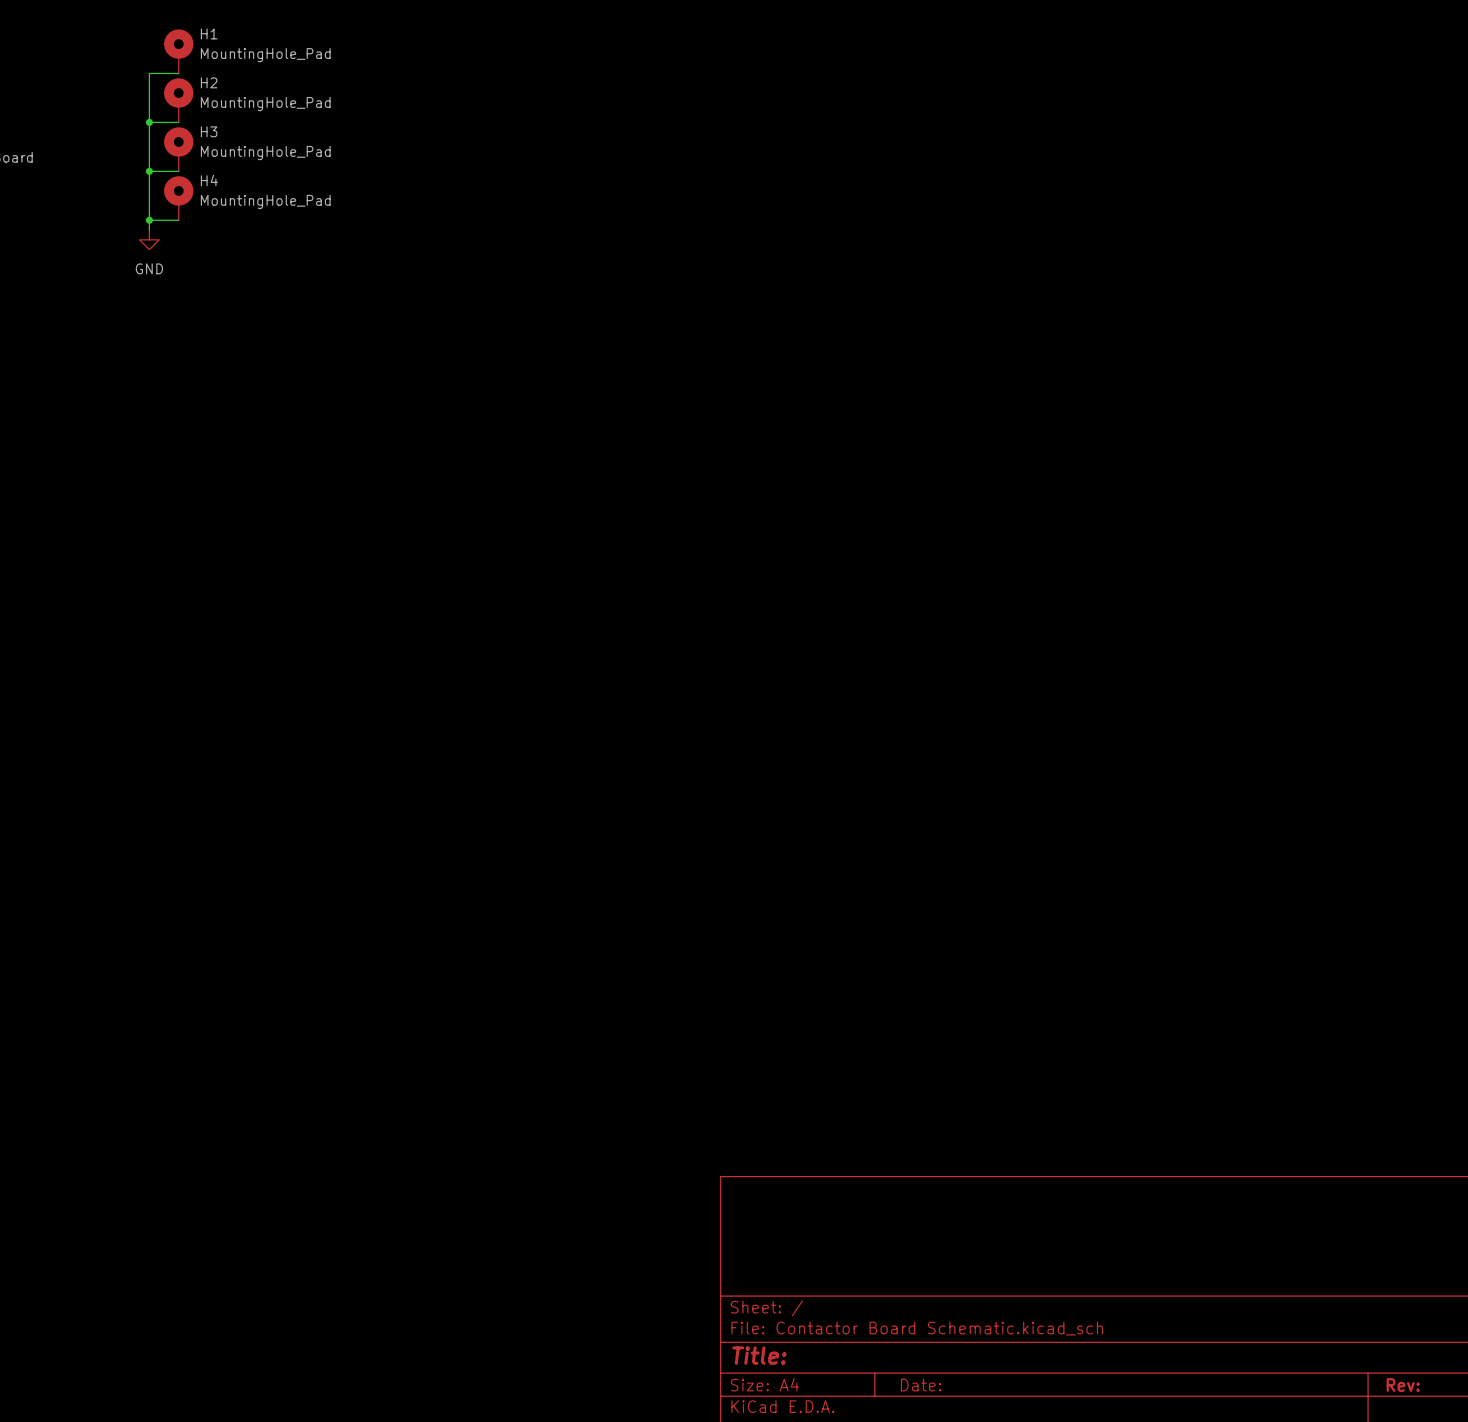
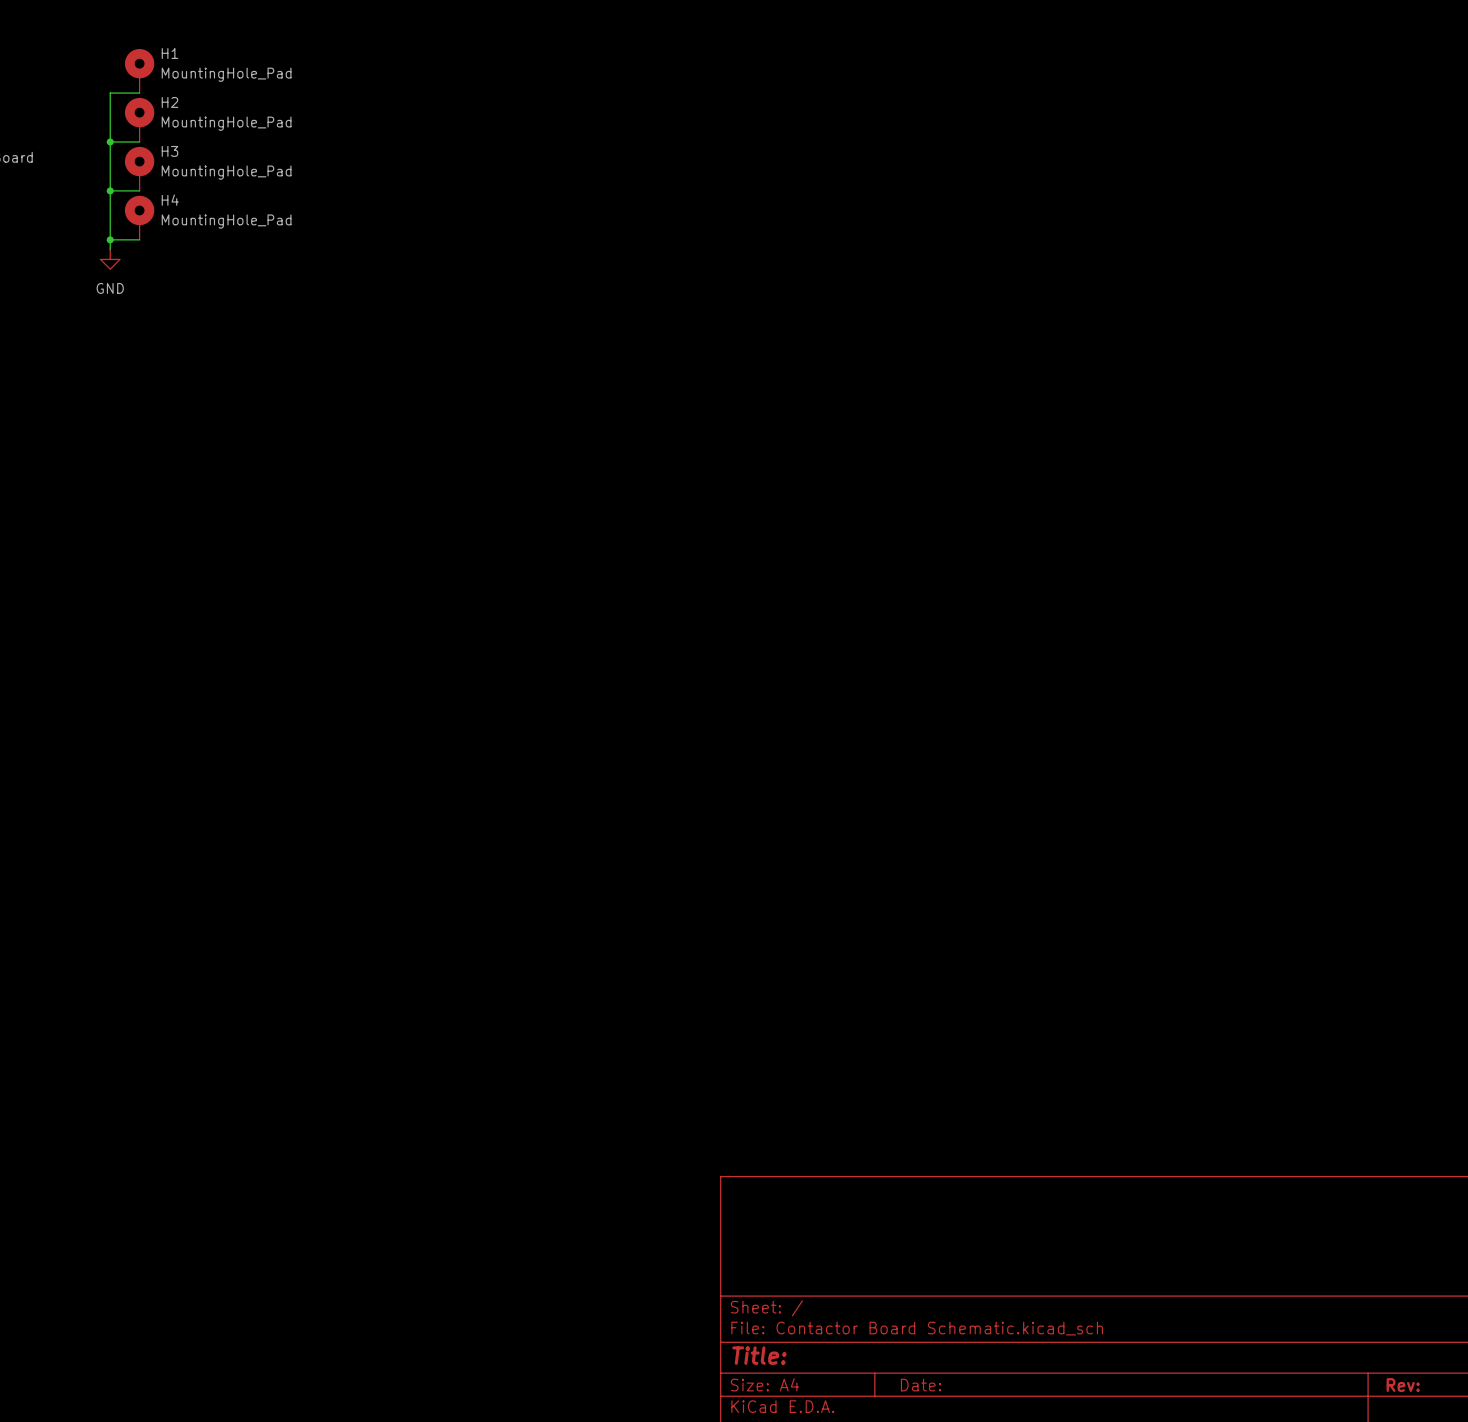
H1 position: (178, 51) -> (139, 71)
wire: (178, 73) (149, 73) (149, 230) -> (139, 93) (110, 93) (110, 249)
H2 position: (178, 100) -> (139, 119)
wire: (149, 122) (178, 122) -> (110, 141) (139, 141)
junction: (149, 122) -> none
junction: none -> (110, 141)
H3 position: (178, 149) -> (139, 168)
wire: (149, 171) (178, 171) -> (110, 190) (139, 190)
junction: (149, 171) -> none
junction: none -> (110, 190)
H4 position: (178, 198) -> (139, 217)
wire: (149, 220) (178, 220) -> (110, 239) (139, 239)
junction: (149, 220) -> none
junction: none -> (110, 239)
power symbol position: GND (149, 239) -> GND (110, 259)

